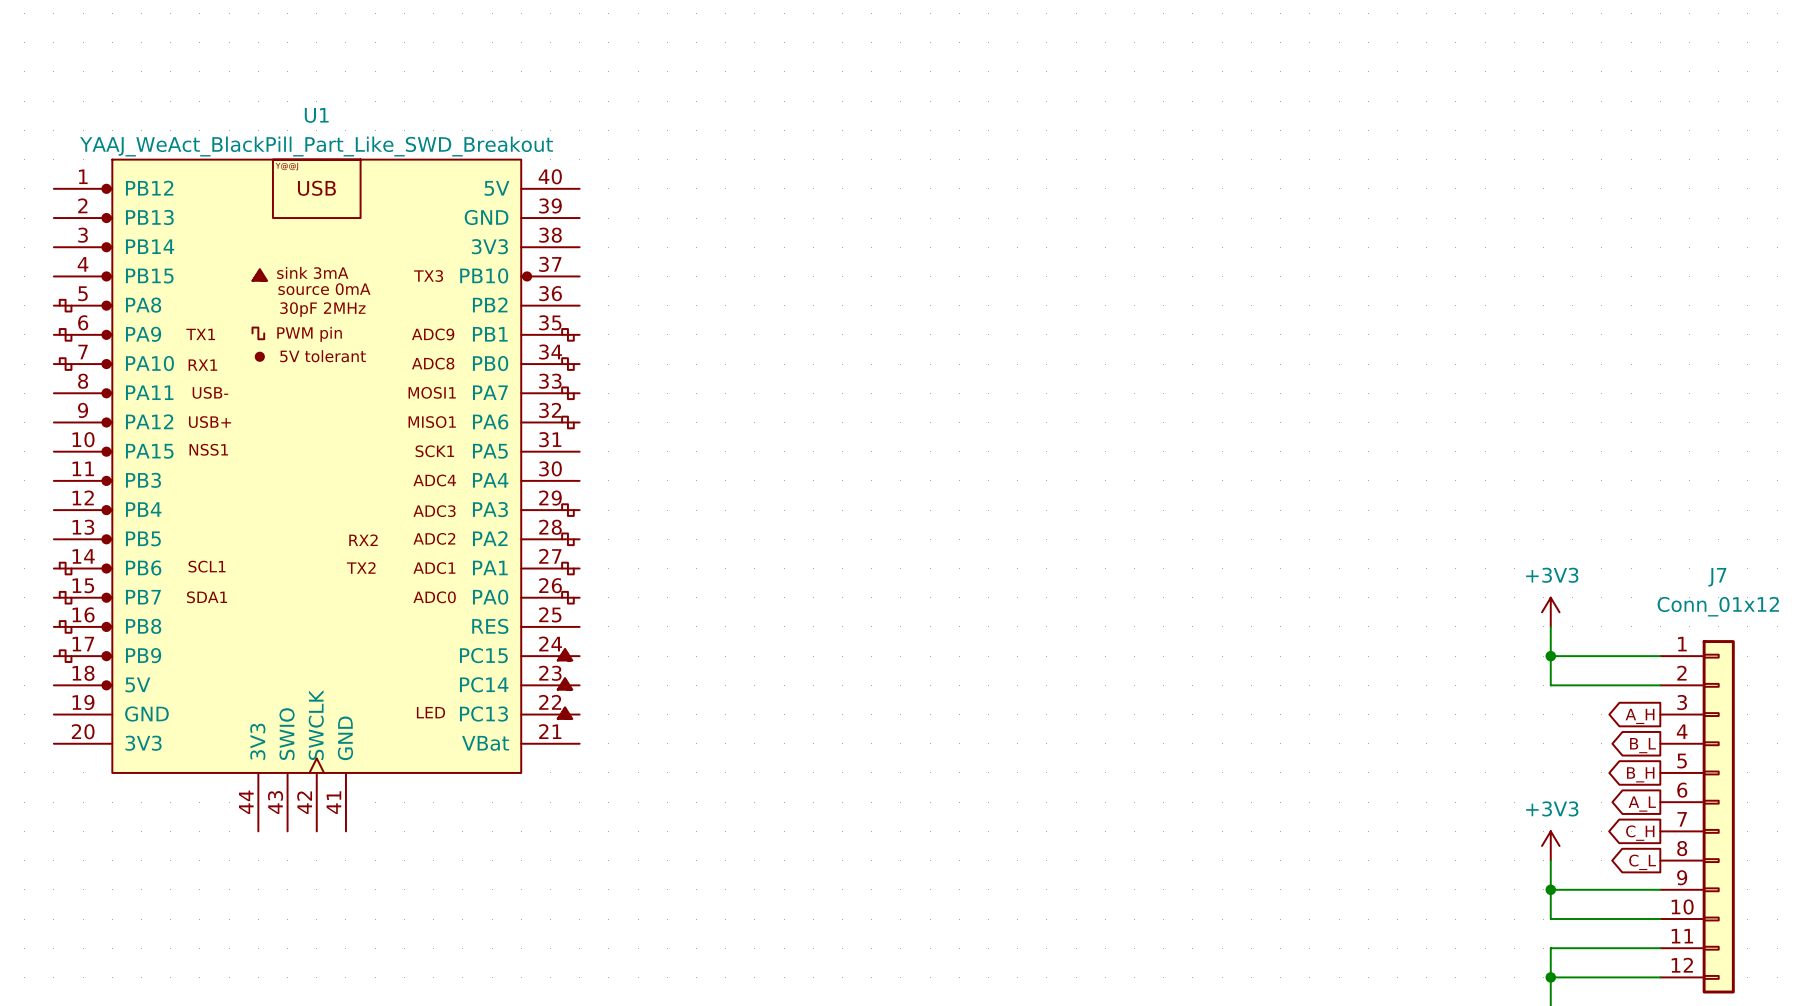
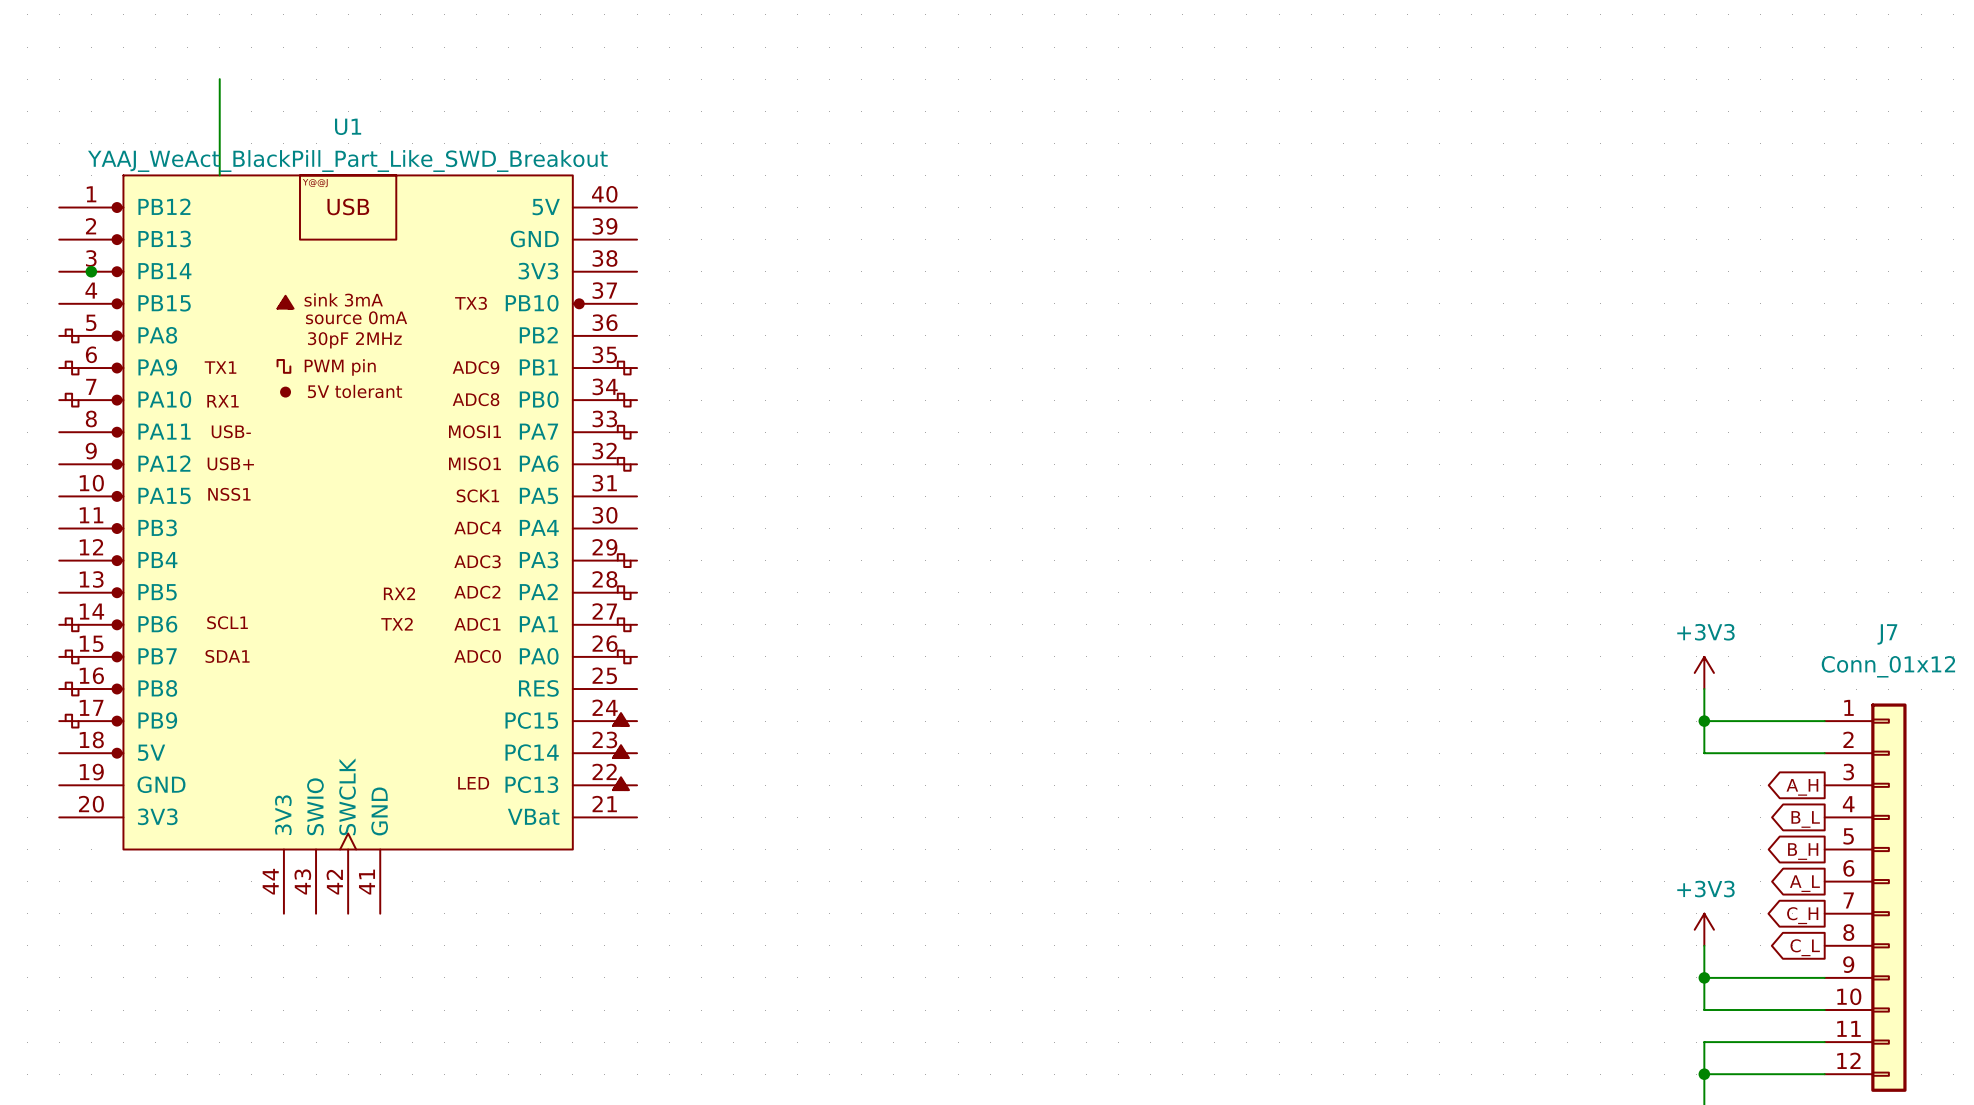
wire: none -> (219, 79) (219, 175)
junction: none -> (91, 271)

